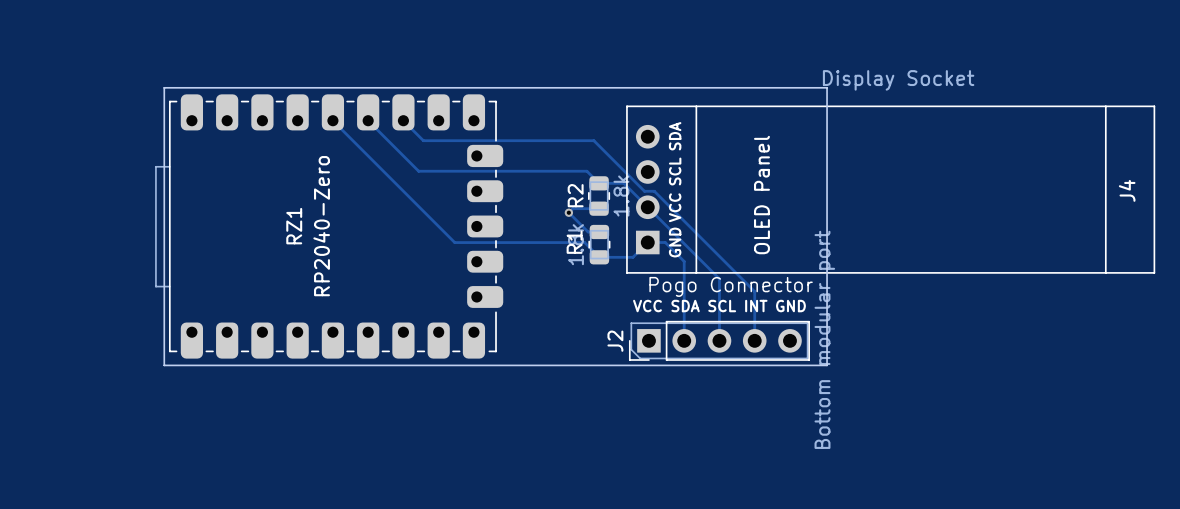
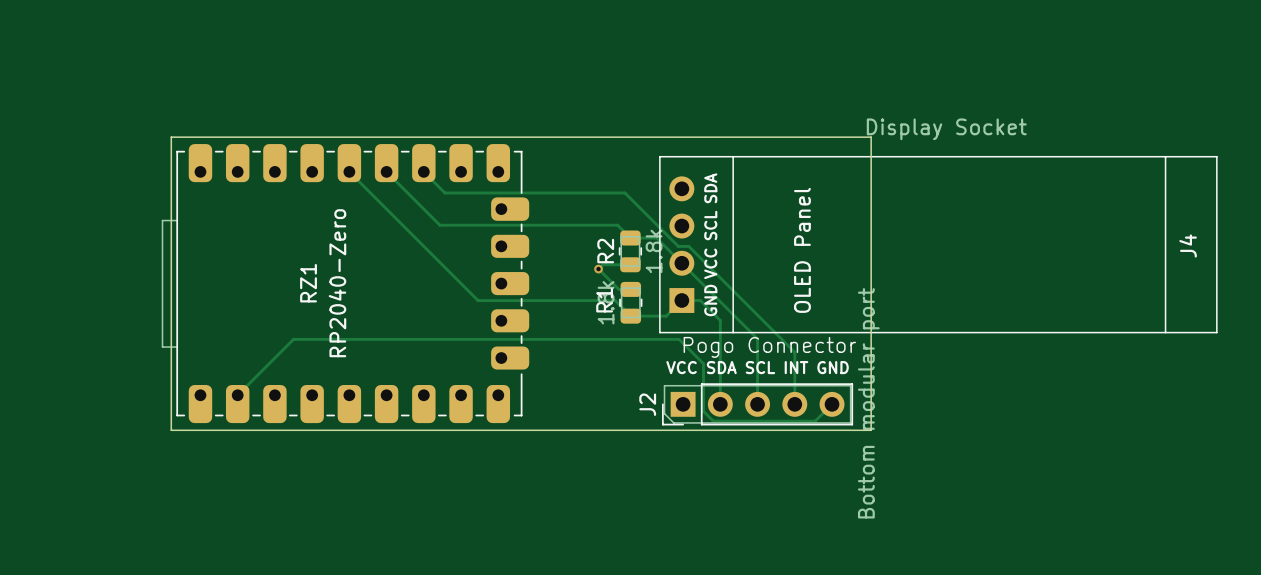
track: none -> (237, 395) (293, 339) (679, 339) (703, 363) (703, 411) (713, 421) (815, 421) (832, 404)

